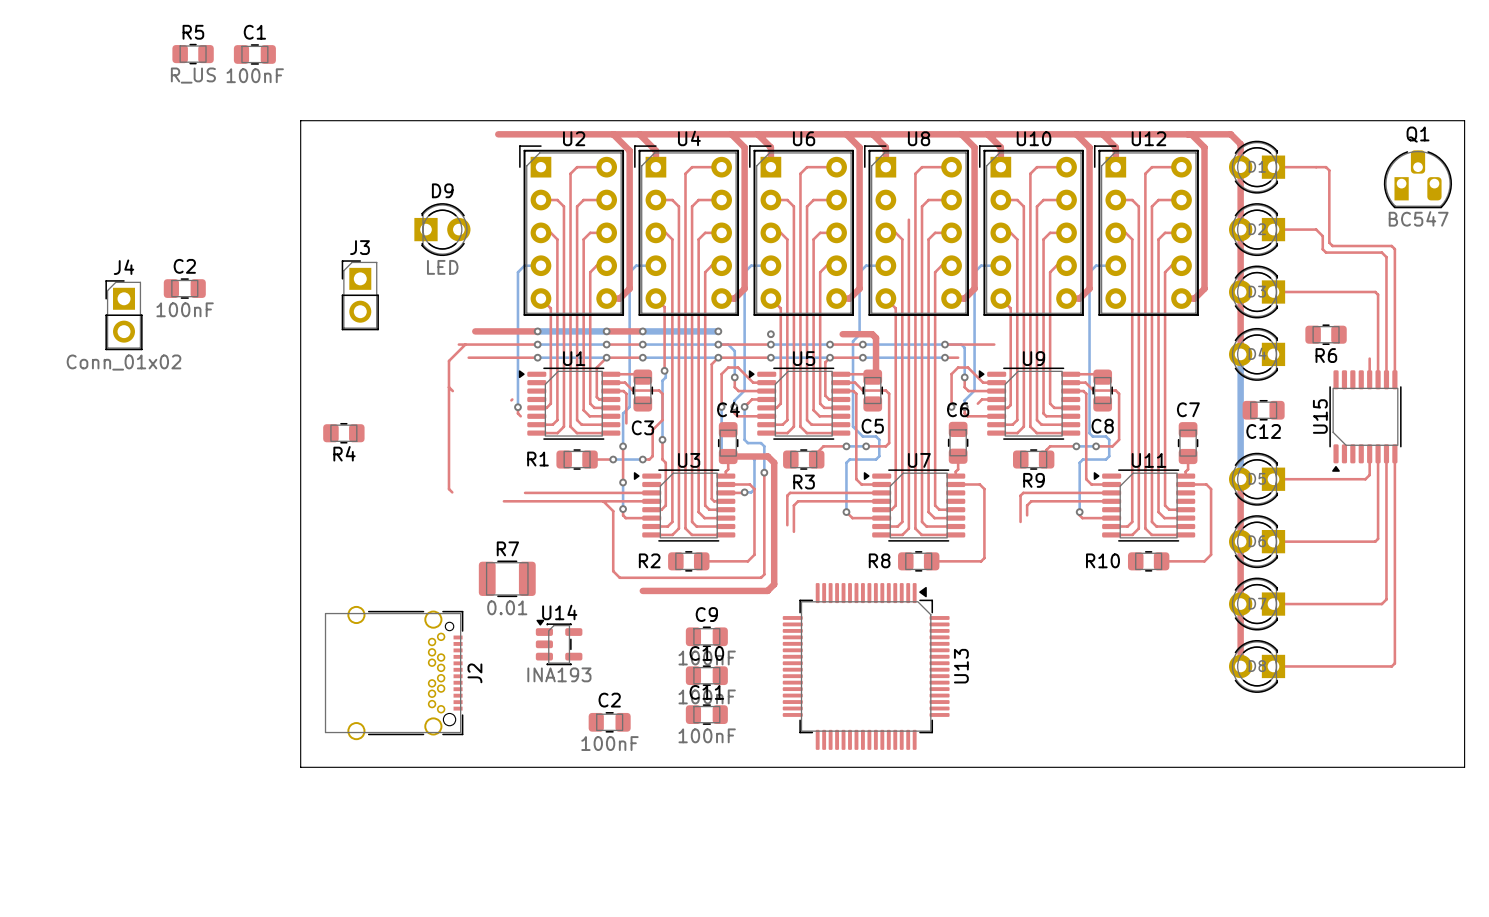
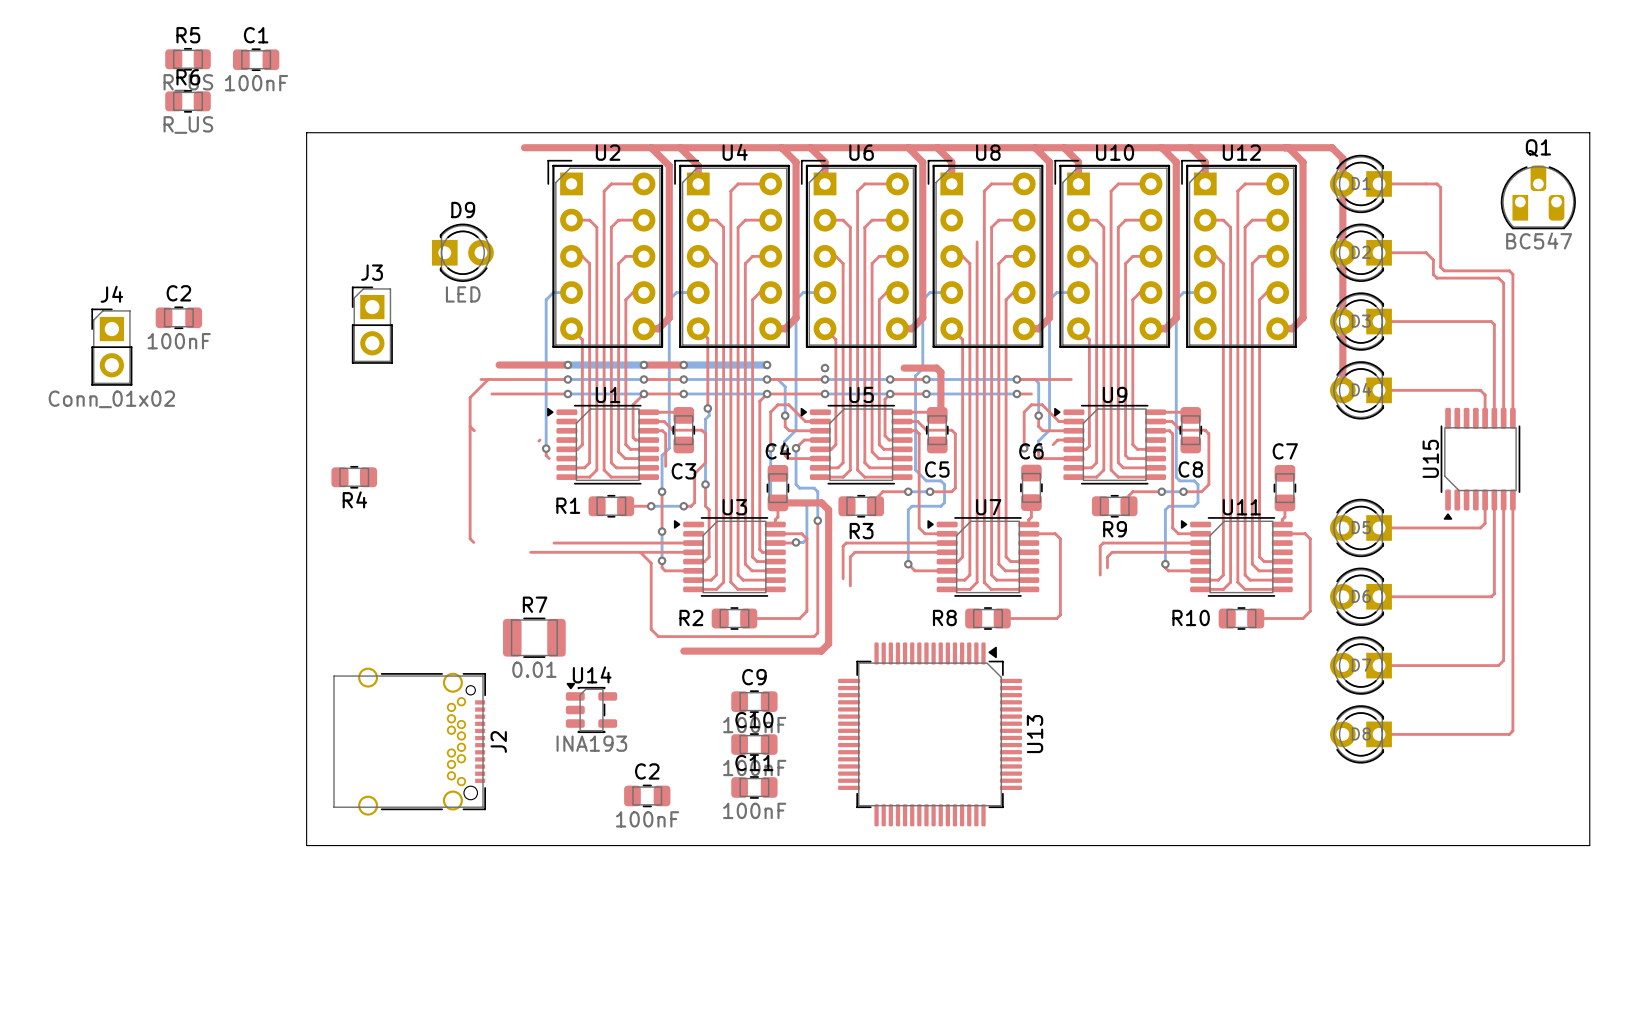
R6 value: none -> R_US (188, 125)
R6 position: (1326, 334) -> (188, 101)
bottom track: (1240, 354) (1240, 479) -> none
top track: none -> (1379, 390) (1480, 390) (1485, 395)
R6 name position: R6 (1326, 355) -> R6 (188, 77)
C12: (1263, 410) -> none
top track: (1240, 479) (1240, 666) -> none

